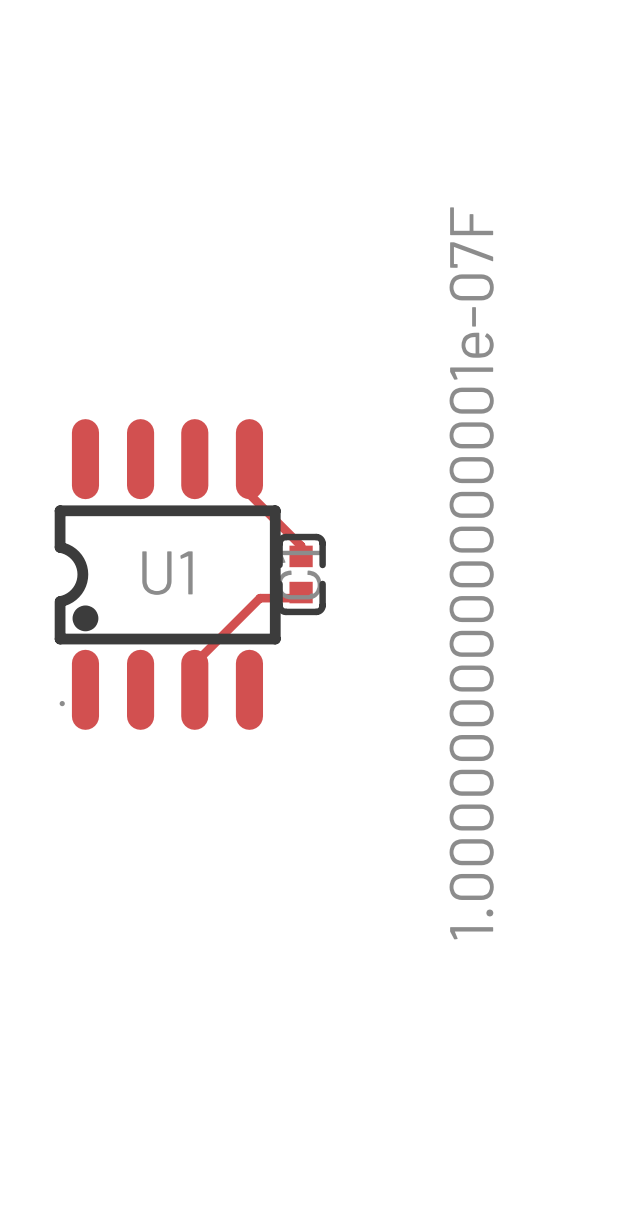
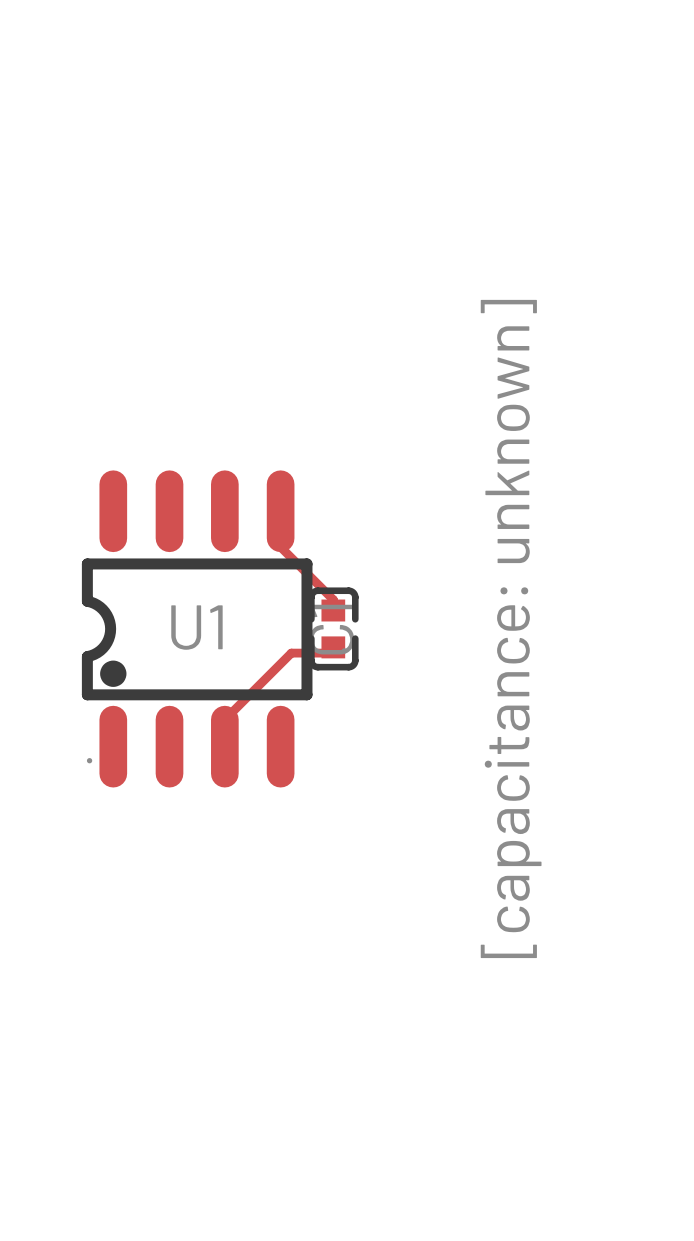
part value: 1.0000000000000001e-07F (471, 573) -> [capacitance: unknown] (511, 628)

